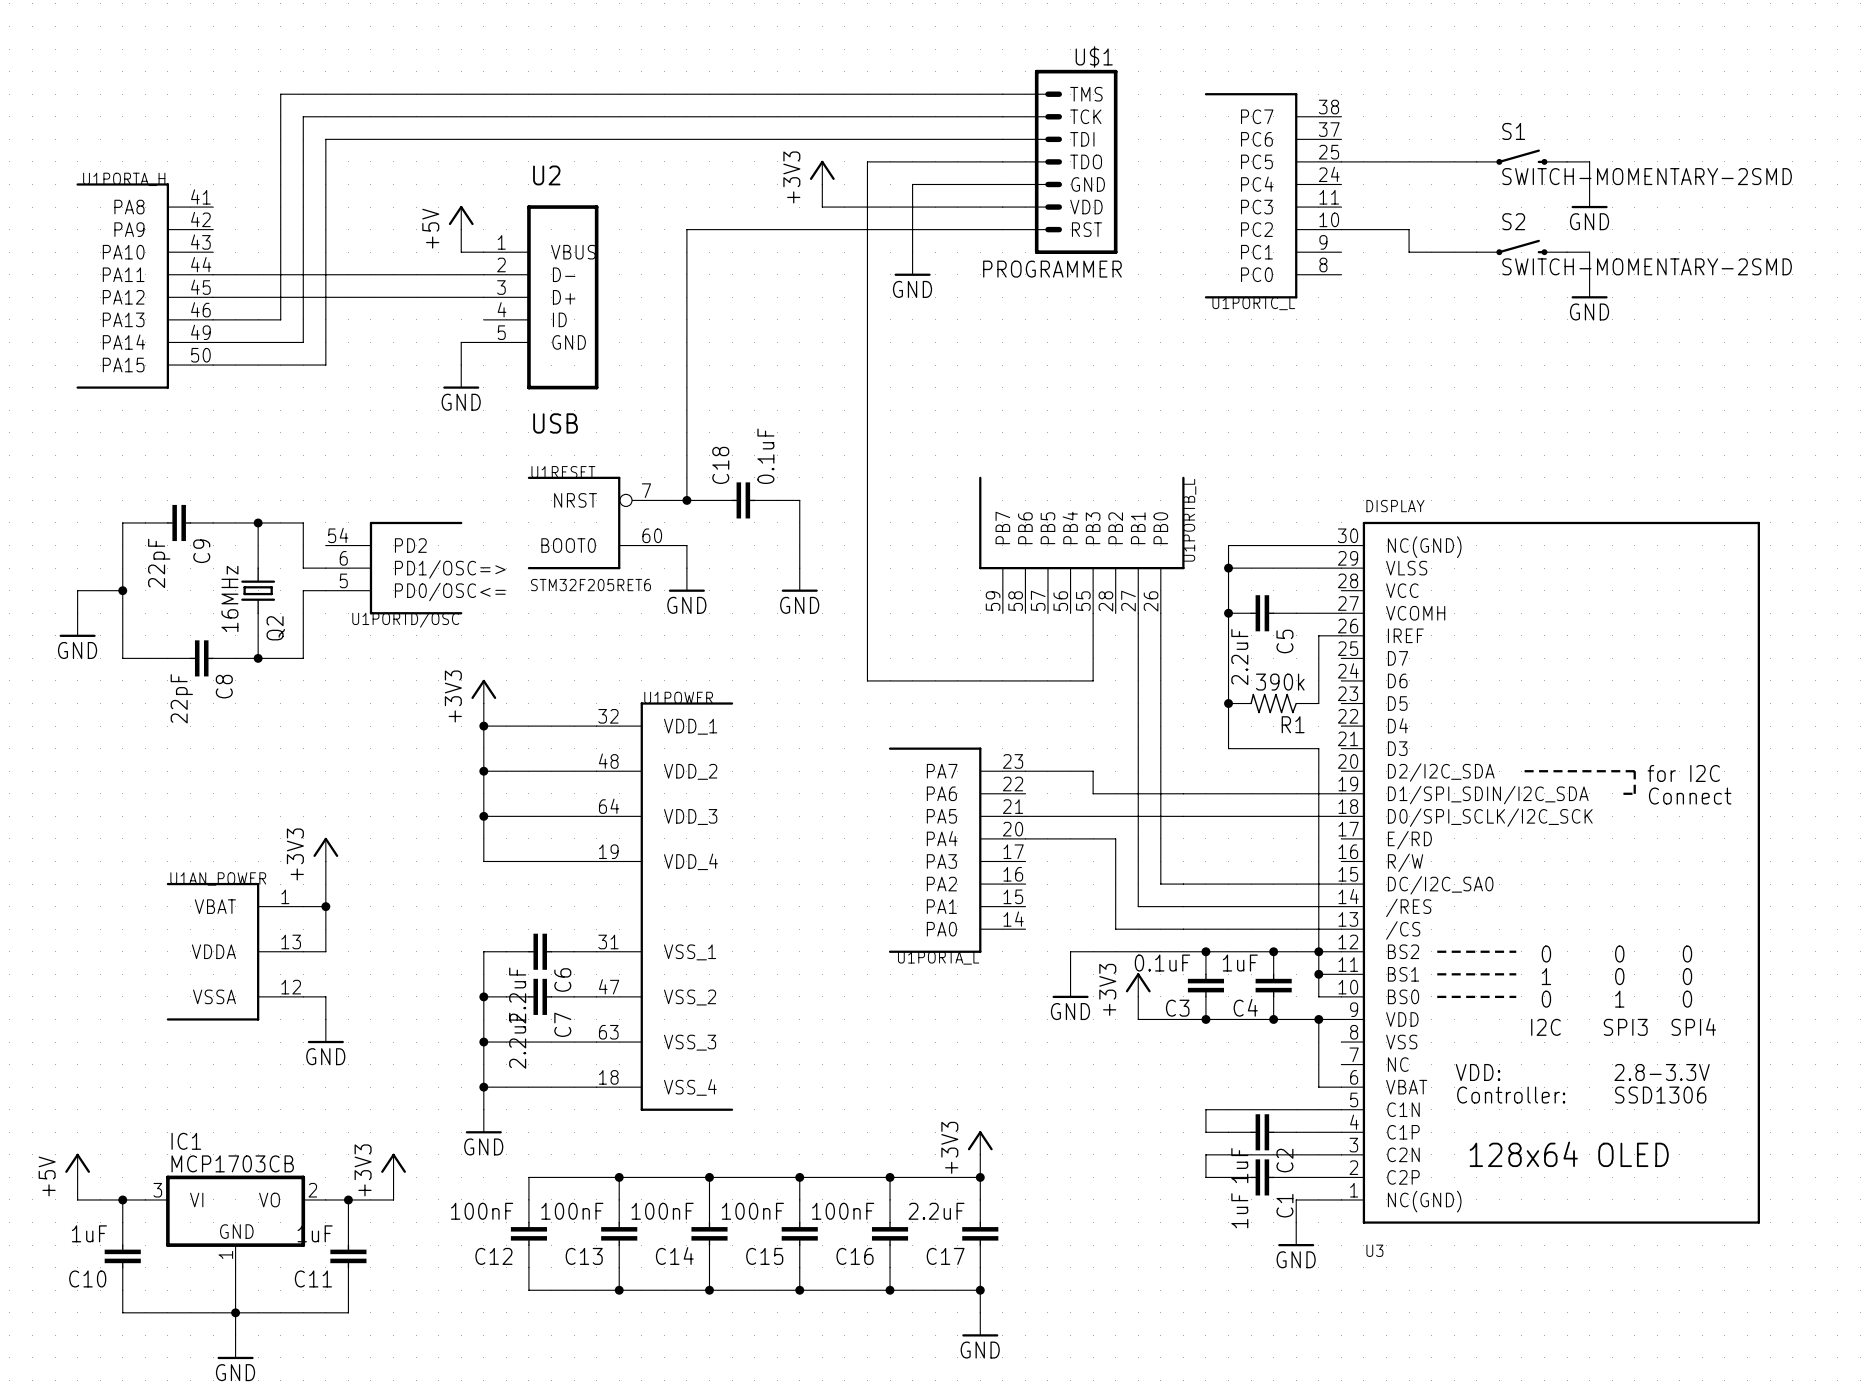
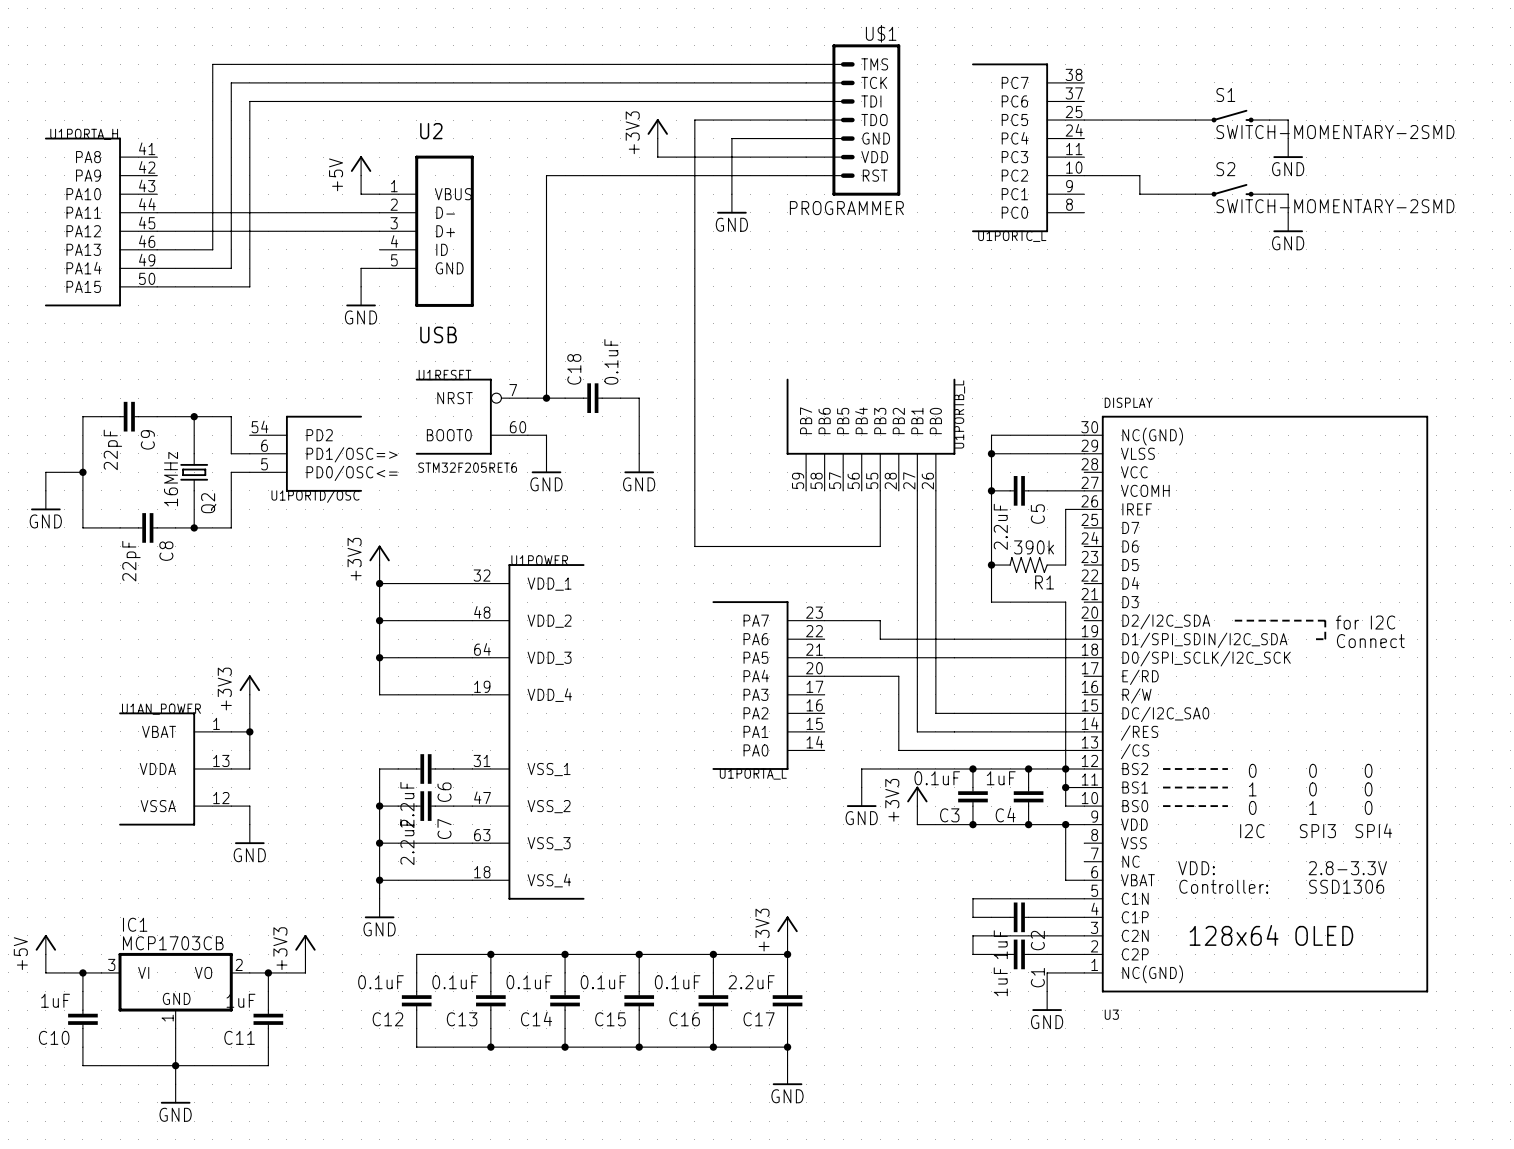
C12 value: 100nF (482, 1211) -> 0.1uF (380, 982)
C13 value: 100nF (572, 1211) -> 0.1uF (455, 982)
C14 value: 100nF (662, 1211) -> 0.1uF (529, 982)
C15 value: 100nF (752, 1211) -> 0.1uF (603, 982)
C16 value: 100nF (843, 1211) -> 0.1uF (677, 982)

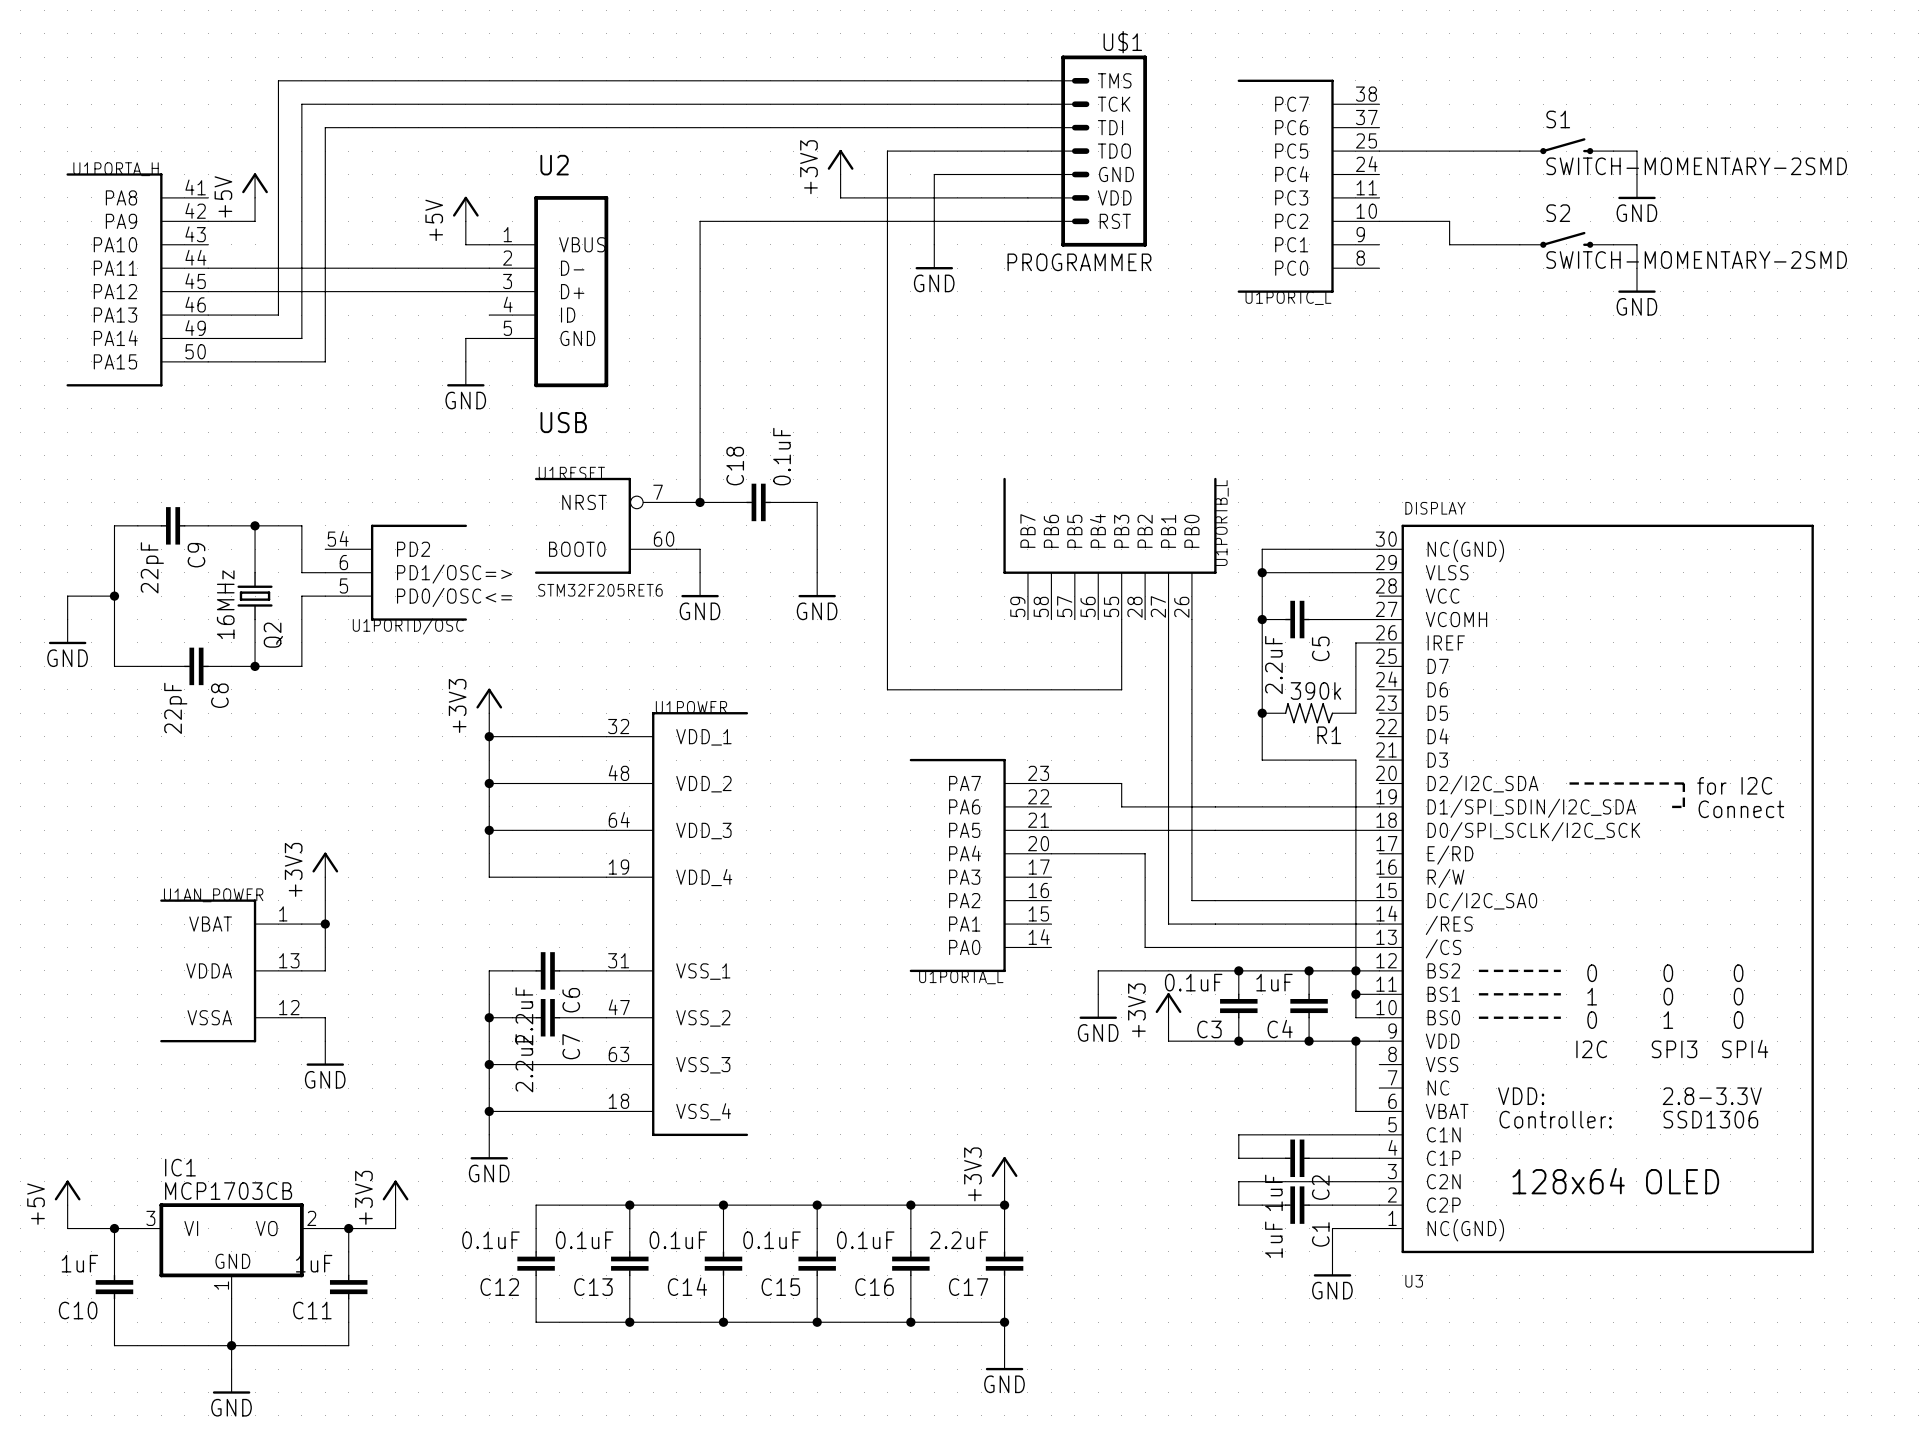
power symbol: none -> +5V (255, 185)
wire: none -> (255, 197) (255, 221) (208, 221)

